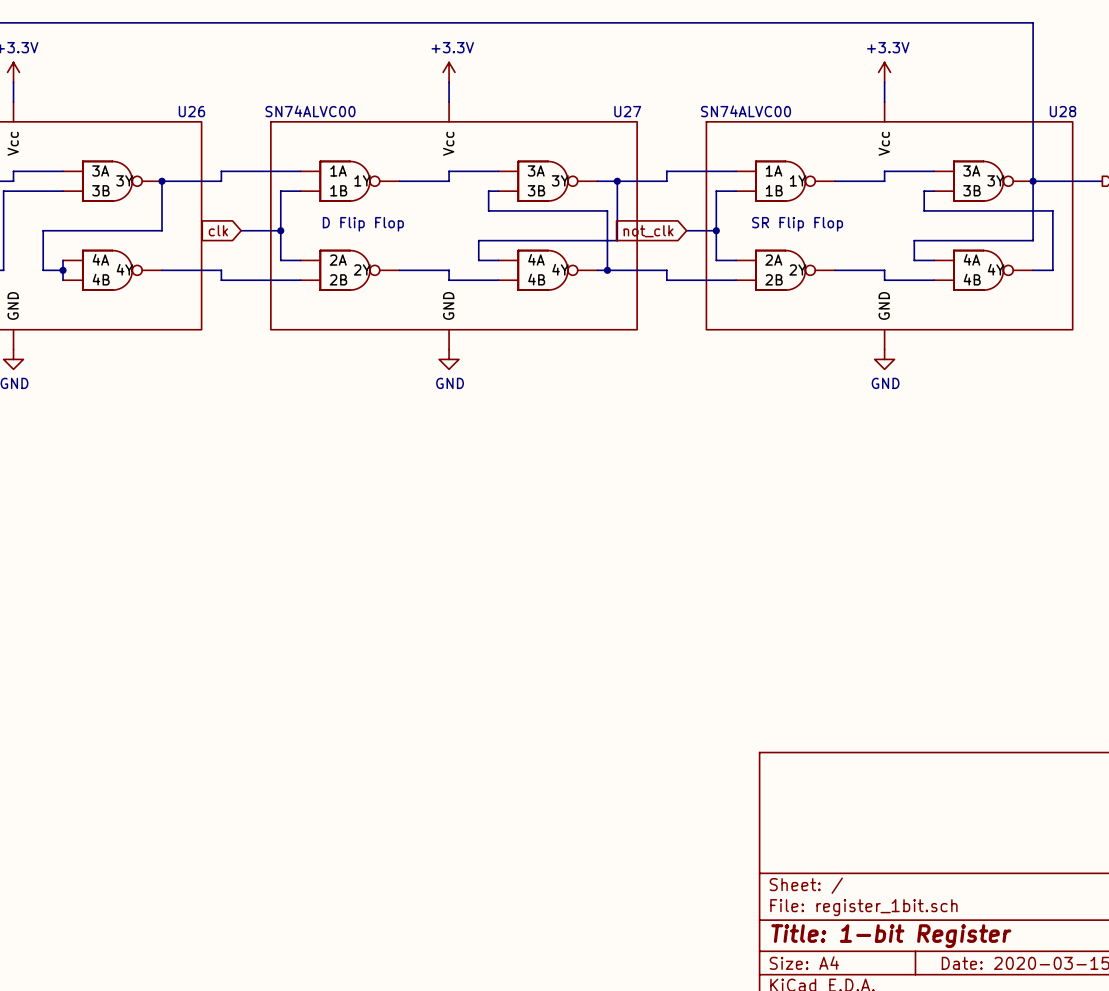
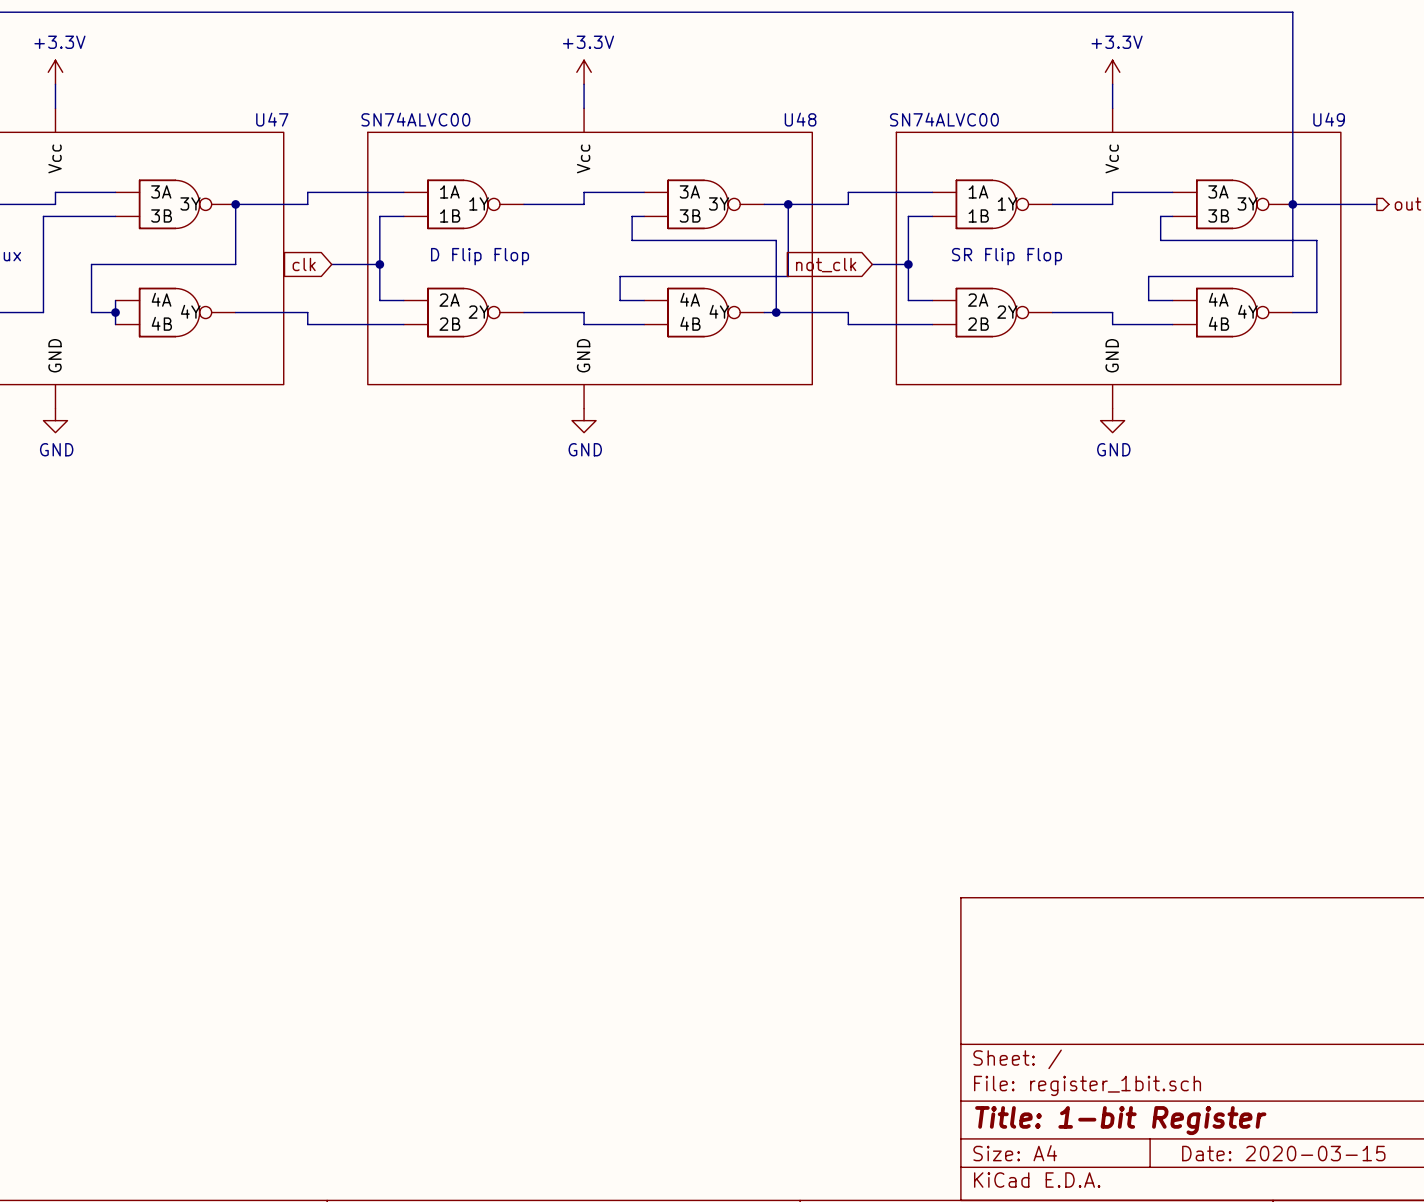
U26 name: U26 (191, 111) -> U47 (272, 119)
U27 name: U27 (627, 111) -> U48 (800, 119)
U28 name: U28 (1063, 111) -> U49 (1329, 119)

